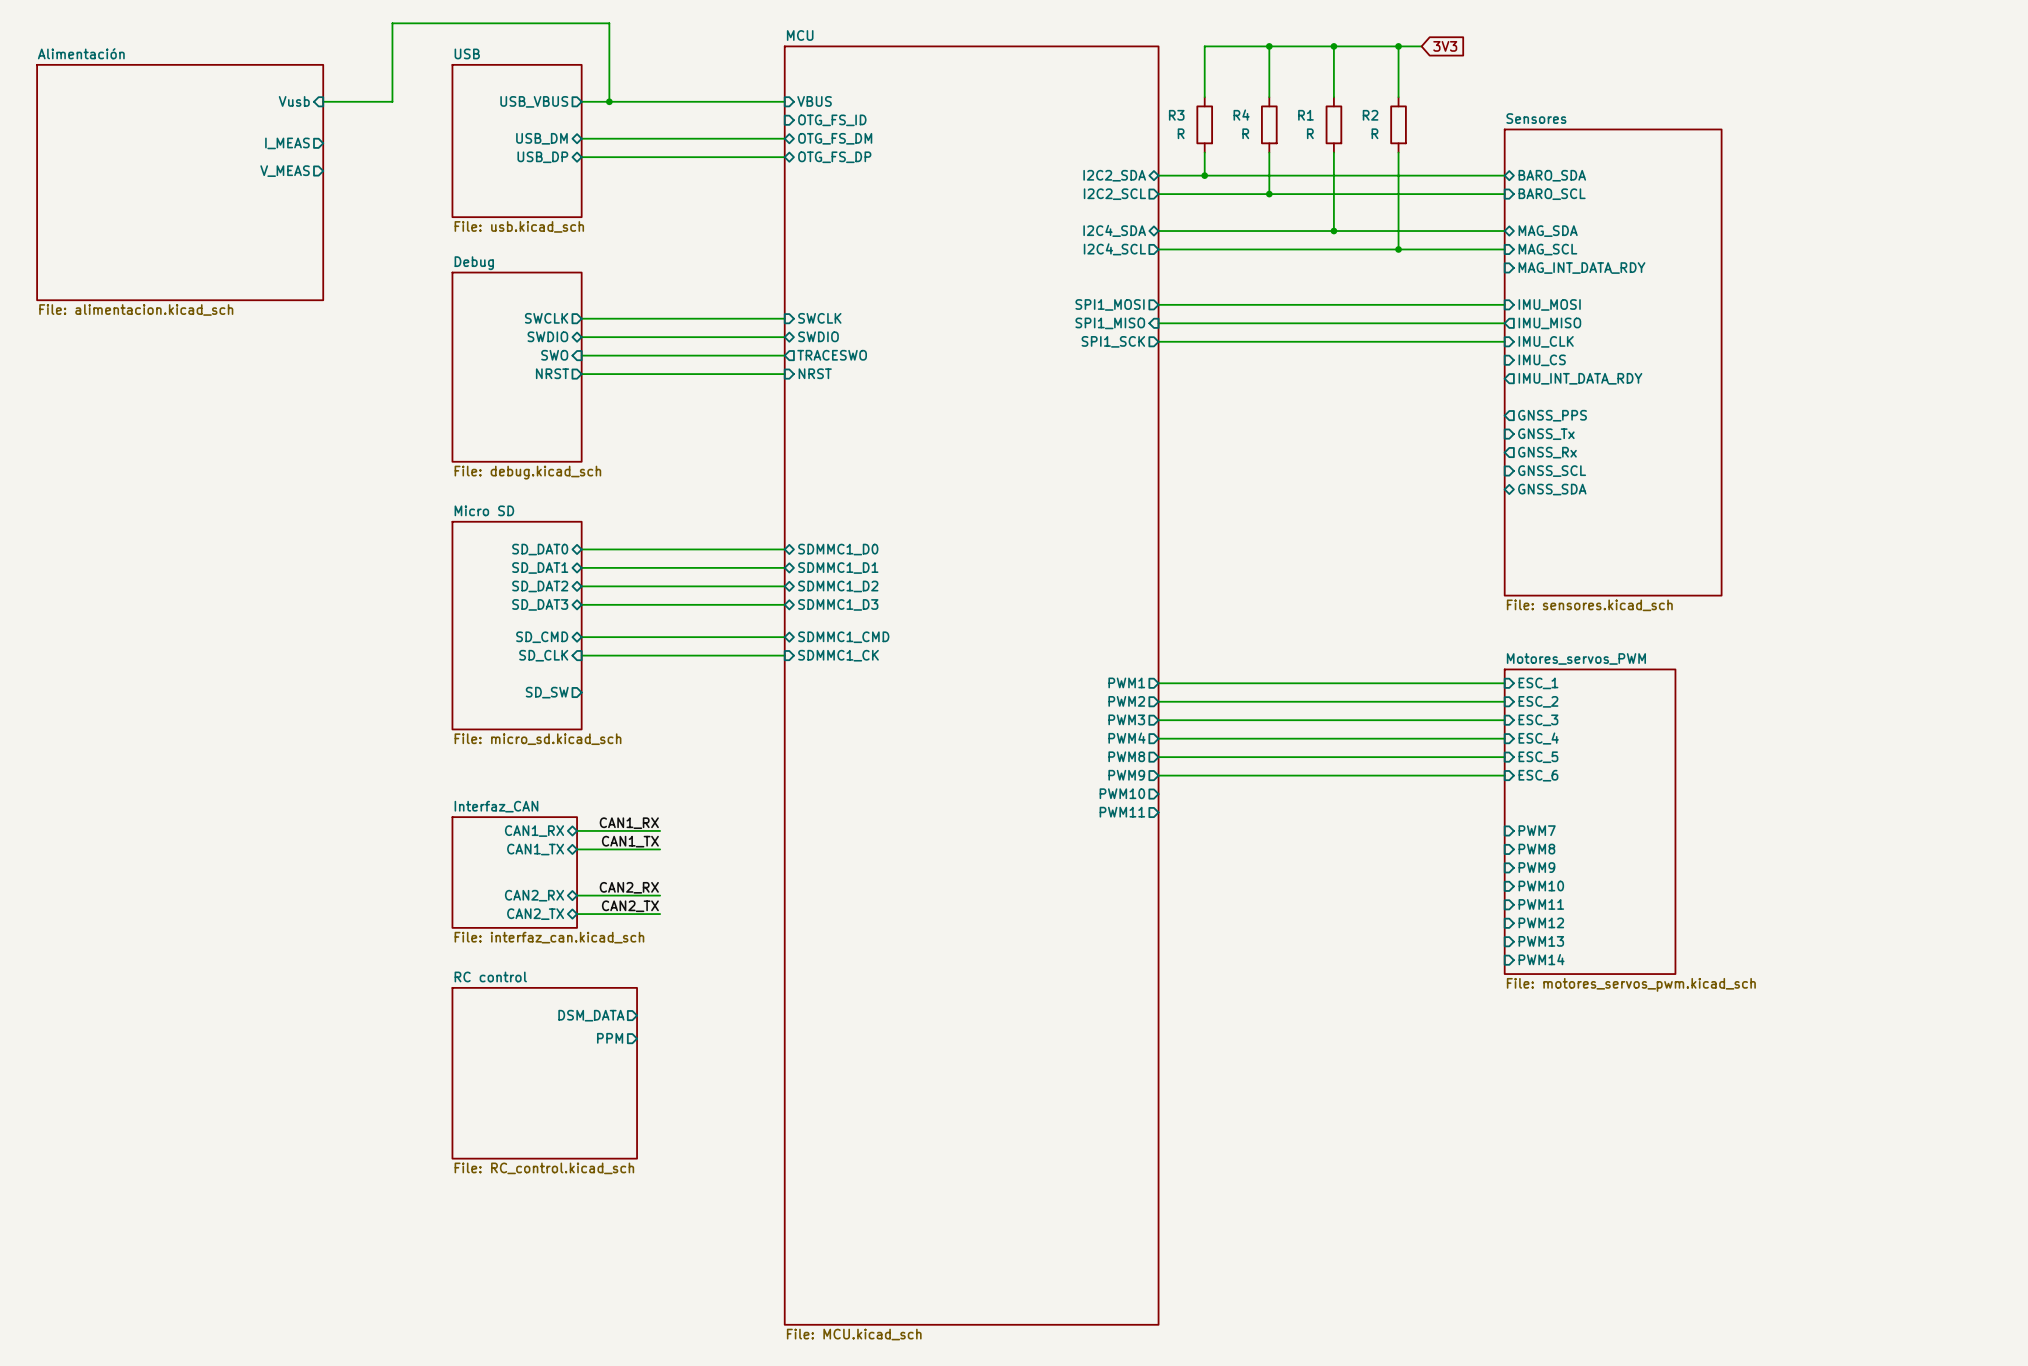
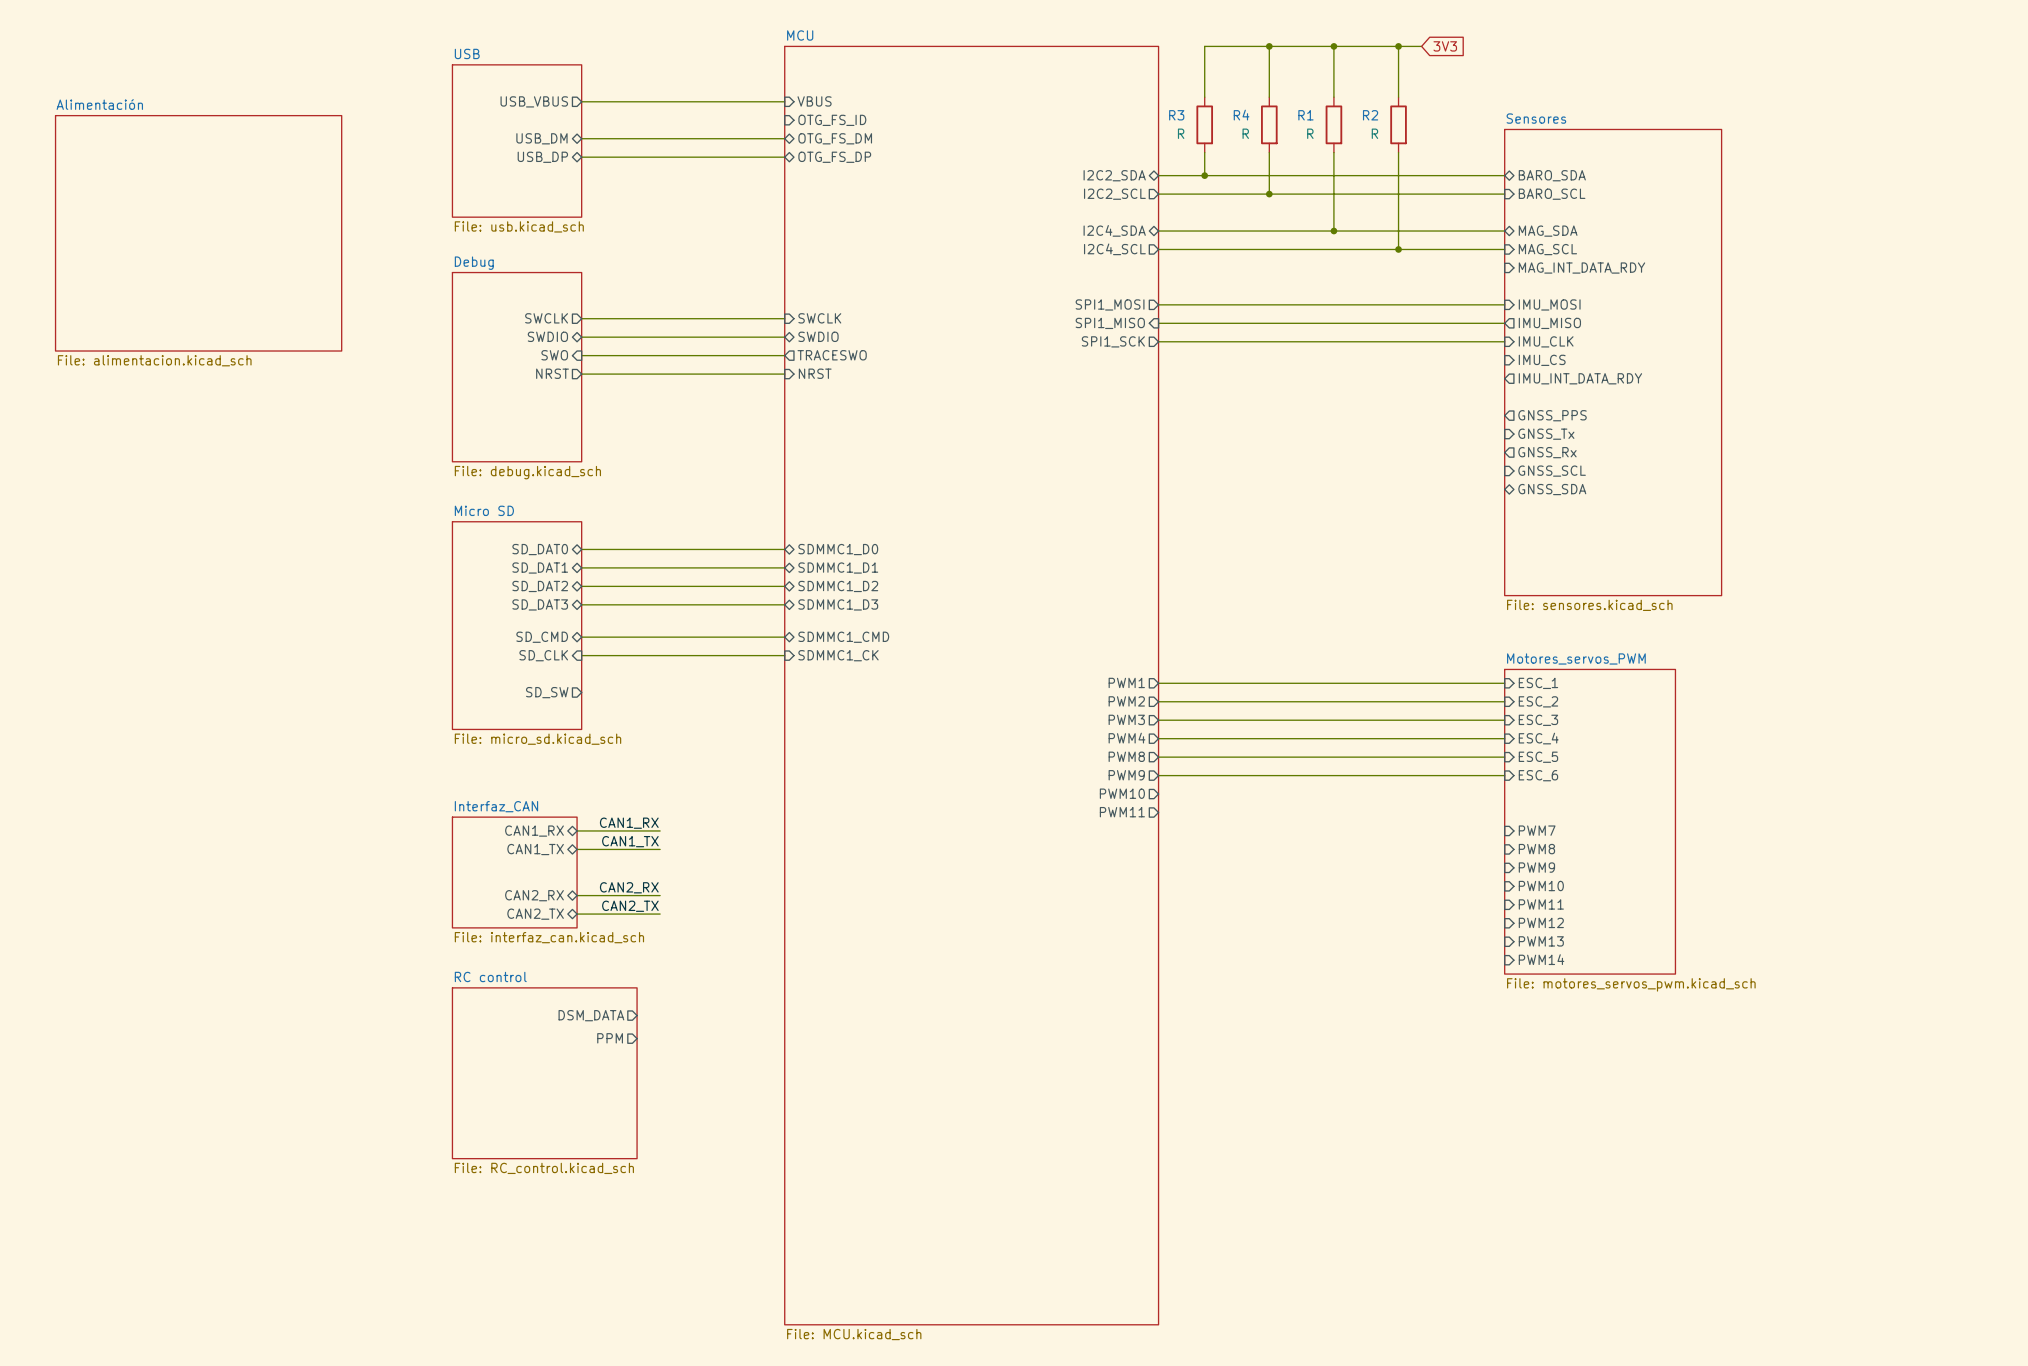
sheet pin: Vusb (294, 101) -> none
wire: (323, 101) (392, 101) (392, 23) (609, 23) (609, 101) -> none
junction: (609, 101) -> none
sheet pin: I_MEAS (287, 143) -> none
sheet pin: V_MEAS (285, 171) -> none
sheet Alimentación position: (180, 182) -> (198, 233)

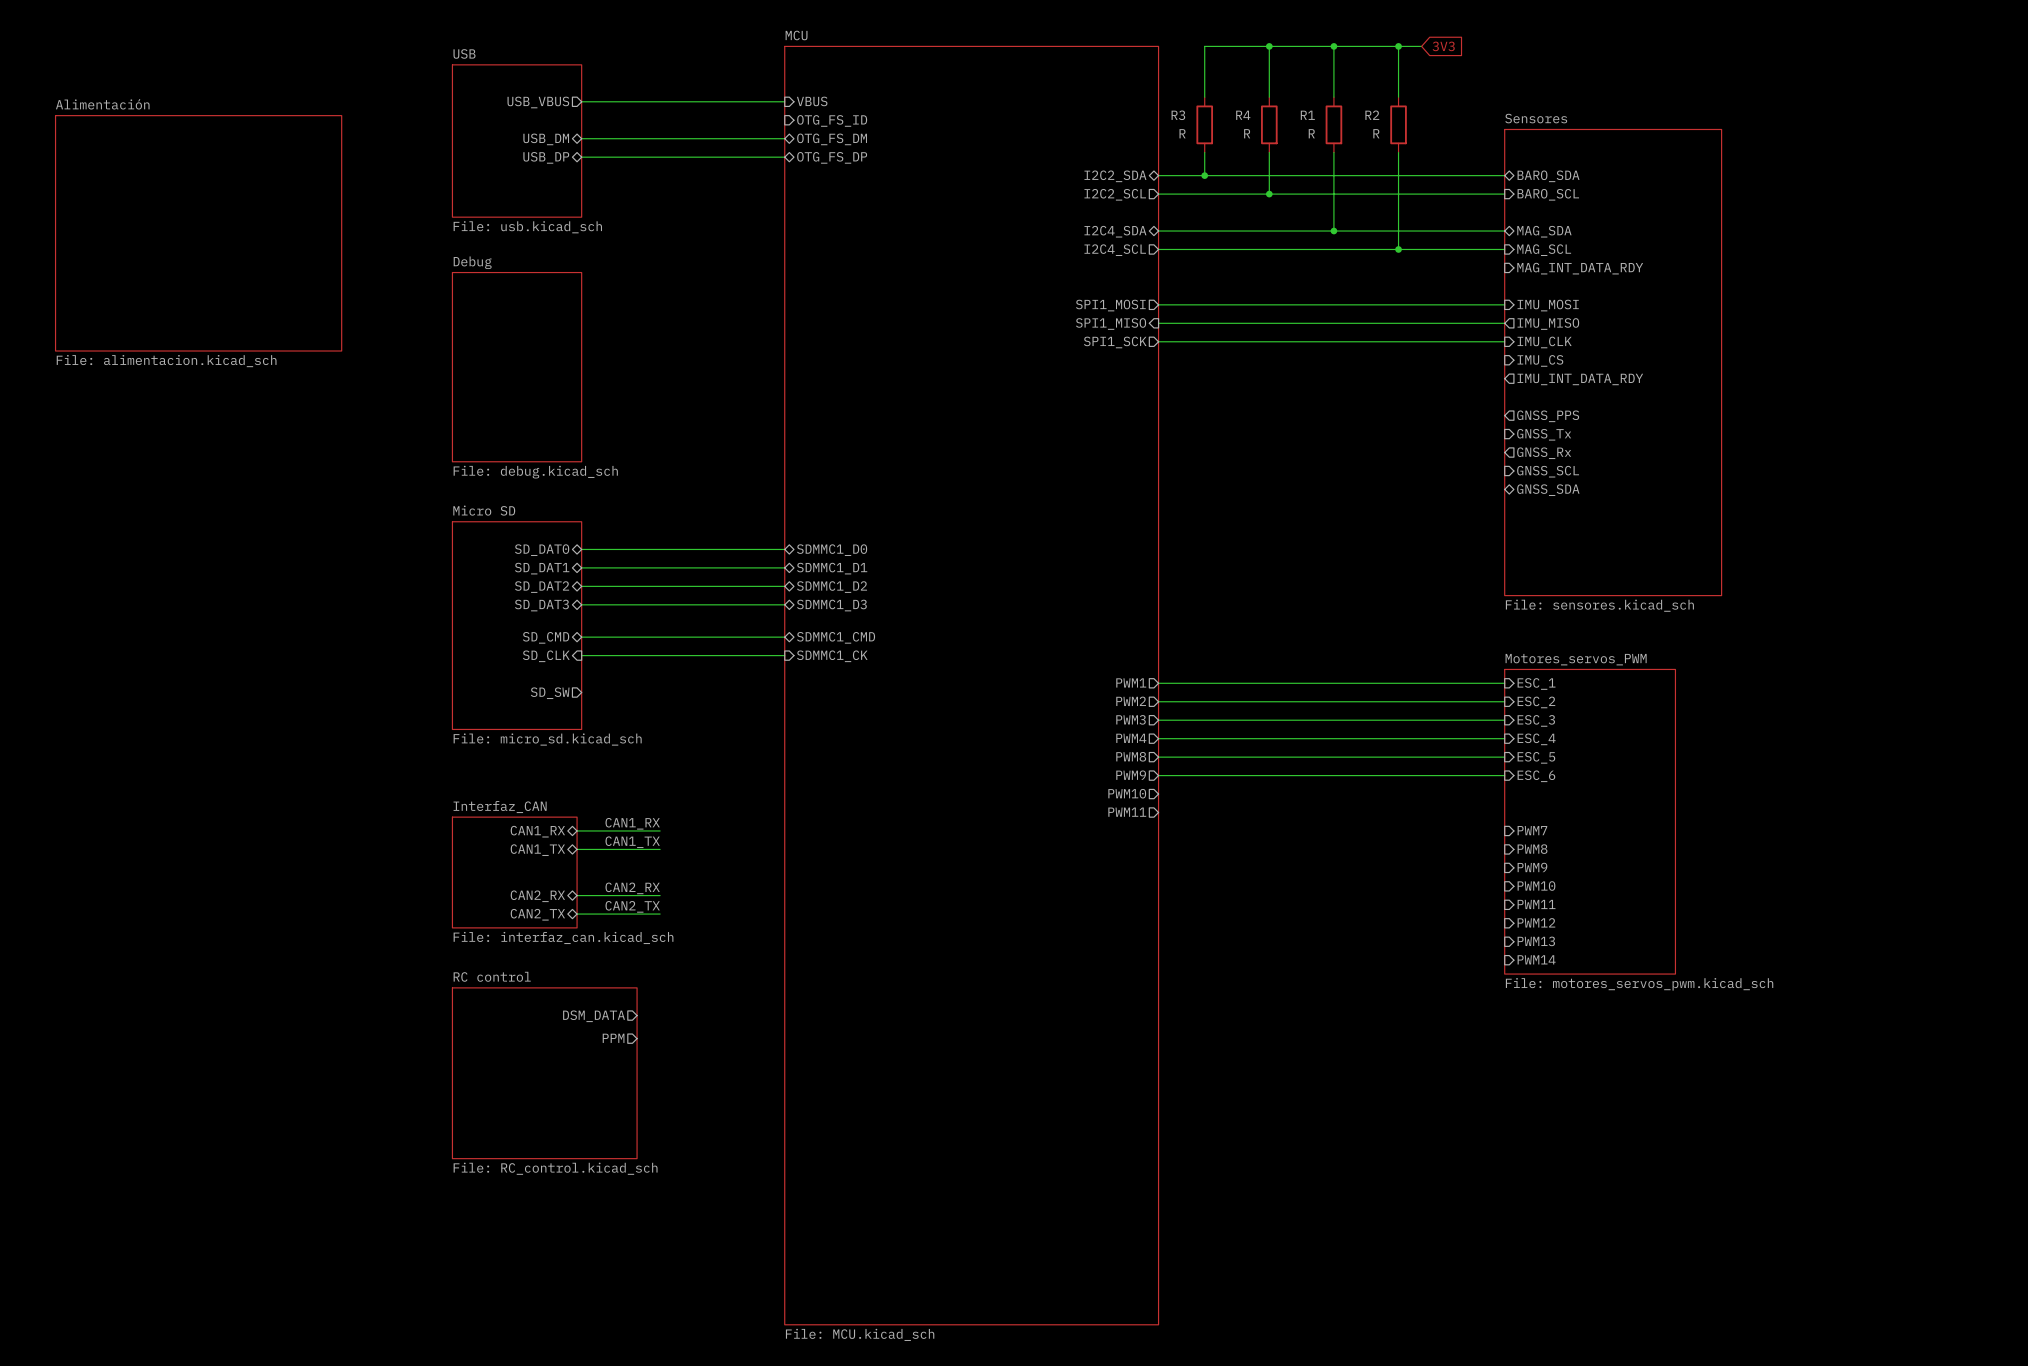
sheet pin: SWCLK (546, 318) -> none
wire: (581, 318) (784, 318) -> none
sheet pin: SWCLK (819, 318) -> none
sheet pin: SWDIO (547, 336) -> none
sheet pin: SWDIO (818, 336) -> none
wire: (581, 337) (784, 337) -> none
sheet pin: SWO (554, 355) -> none
wire: (581, 355) (784, 355) -> none
sheet pin: TRACESWO (832, 355) -> none
sheet pin: NRST (552, 373) -> none
sheet pin: NRST (815, 373) -> none
wire: (581, 374) (784, 374) -> none

